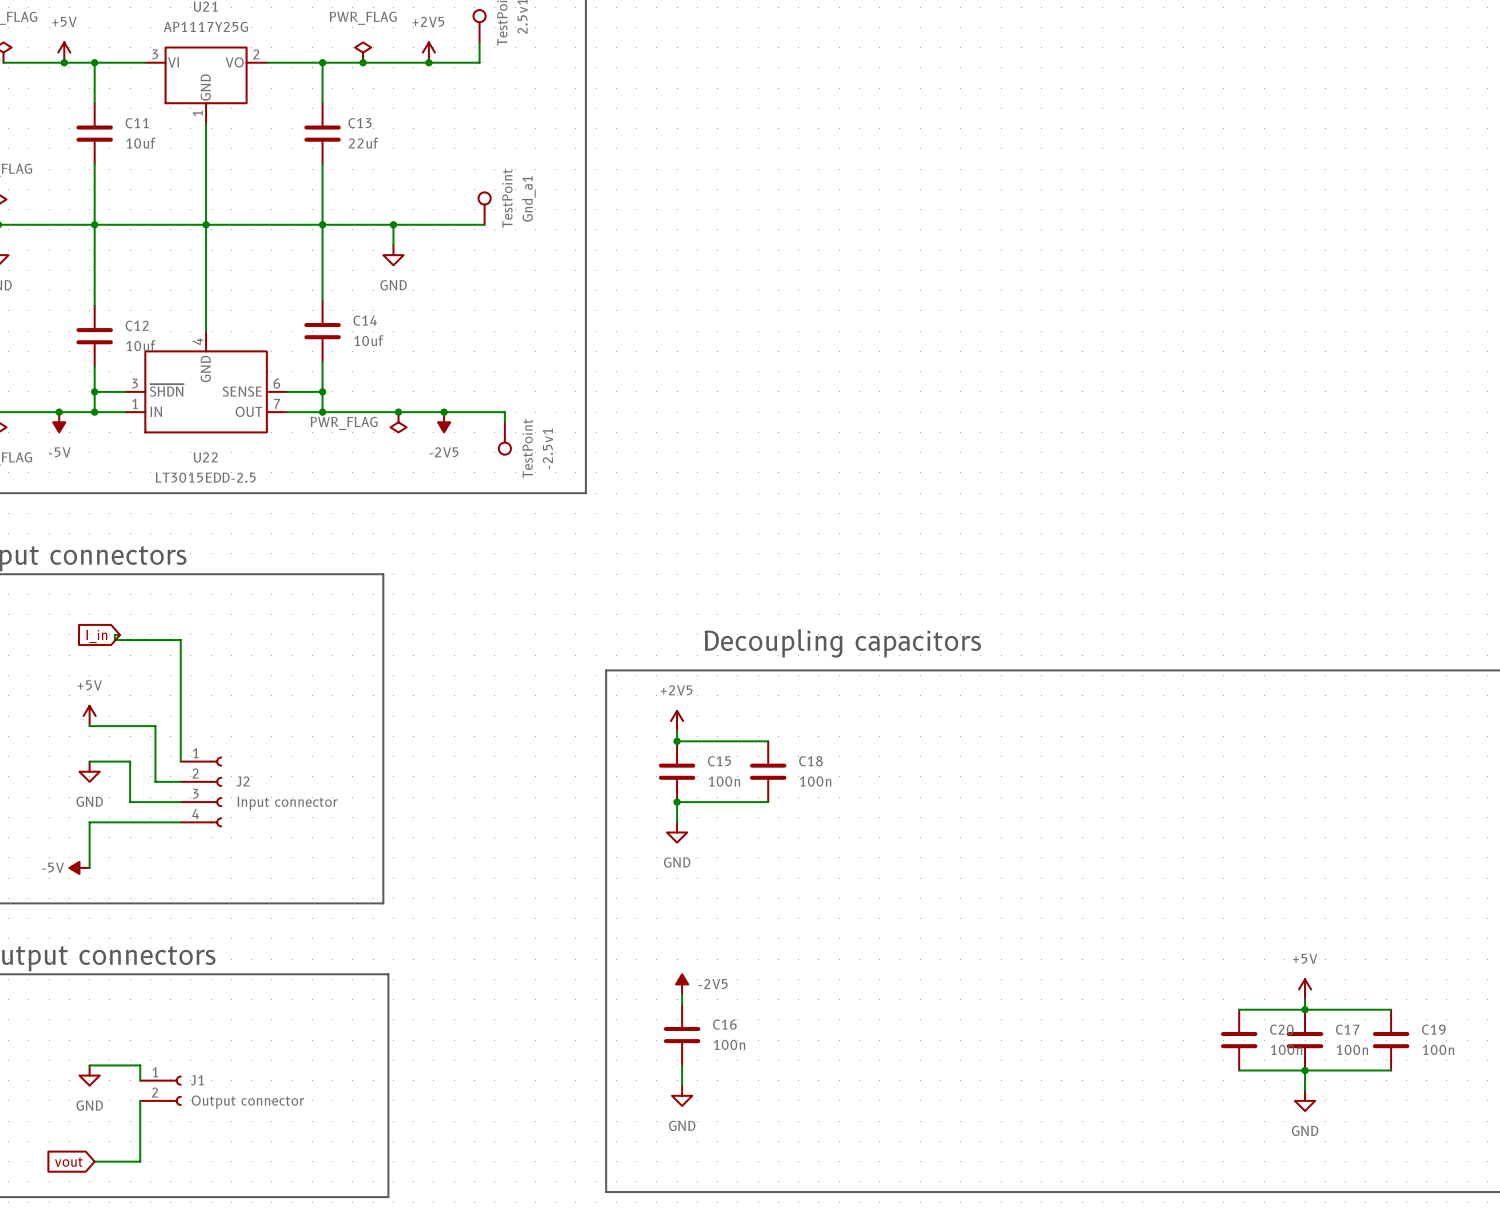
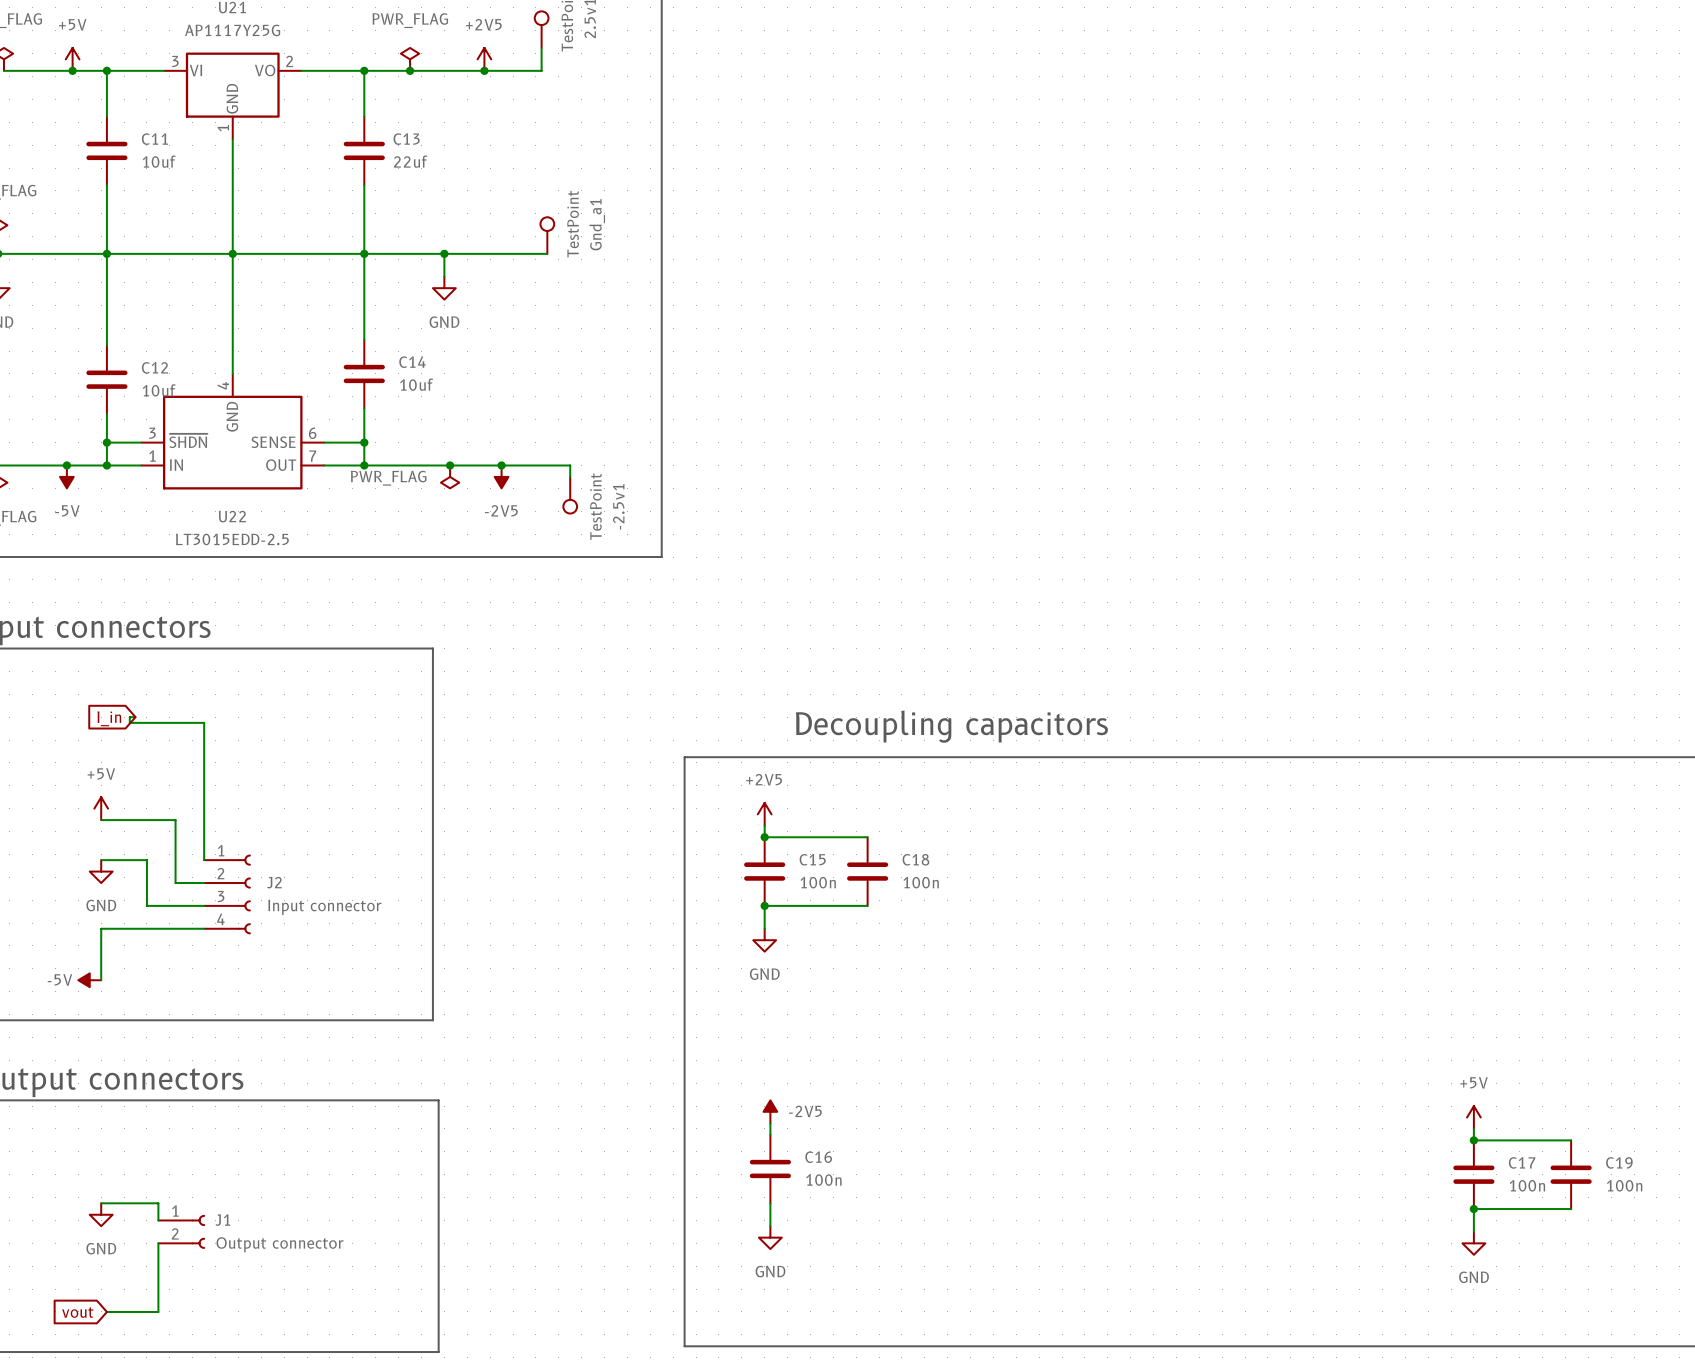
wire: (1239, 1009) (1305, 1009) -> none
C20: 100n (1239, 1040) -> none
wire: (1239, 1070) (1305, 1070) -> none

